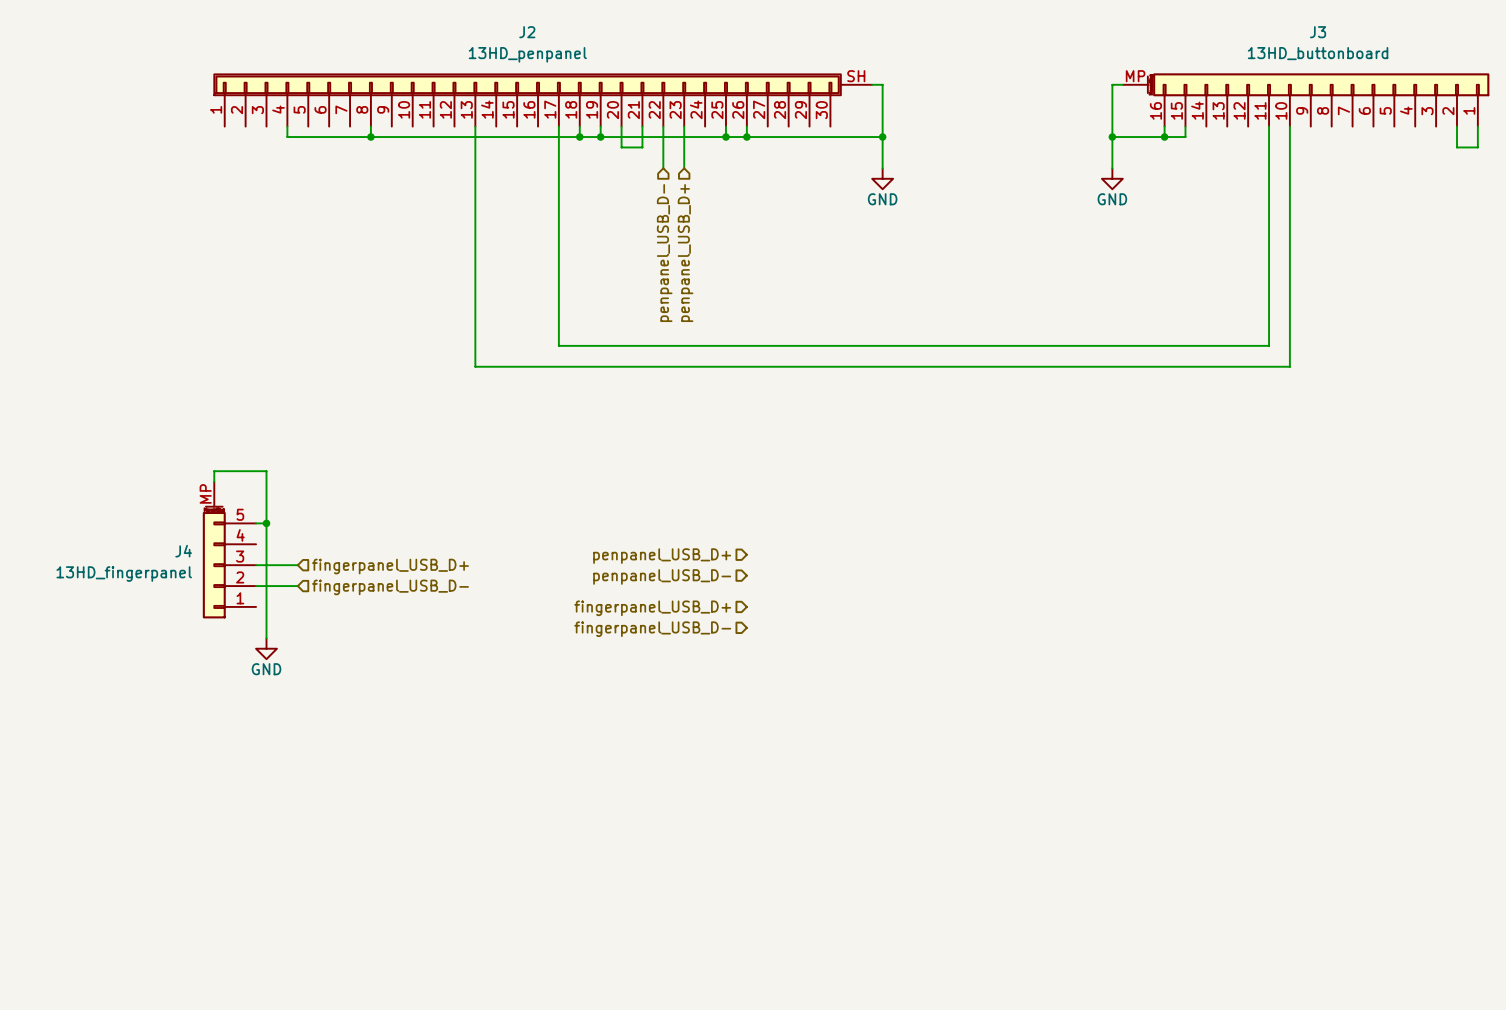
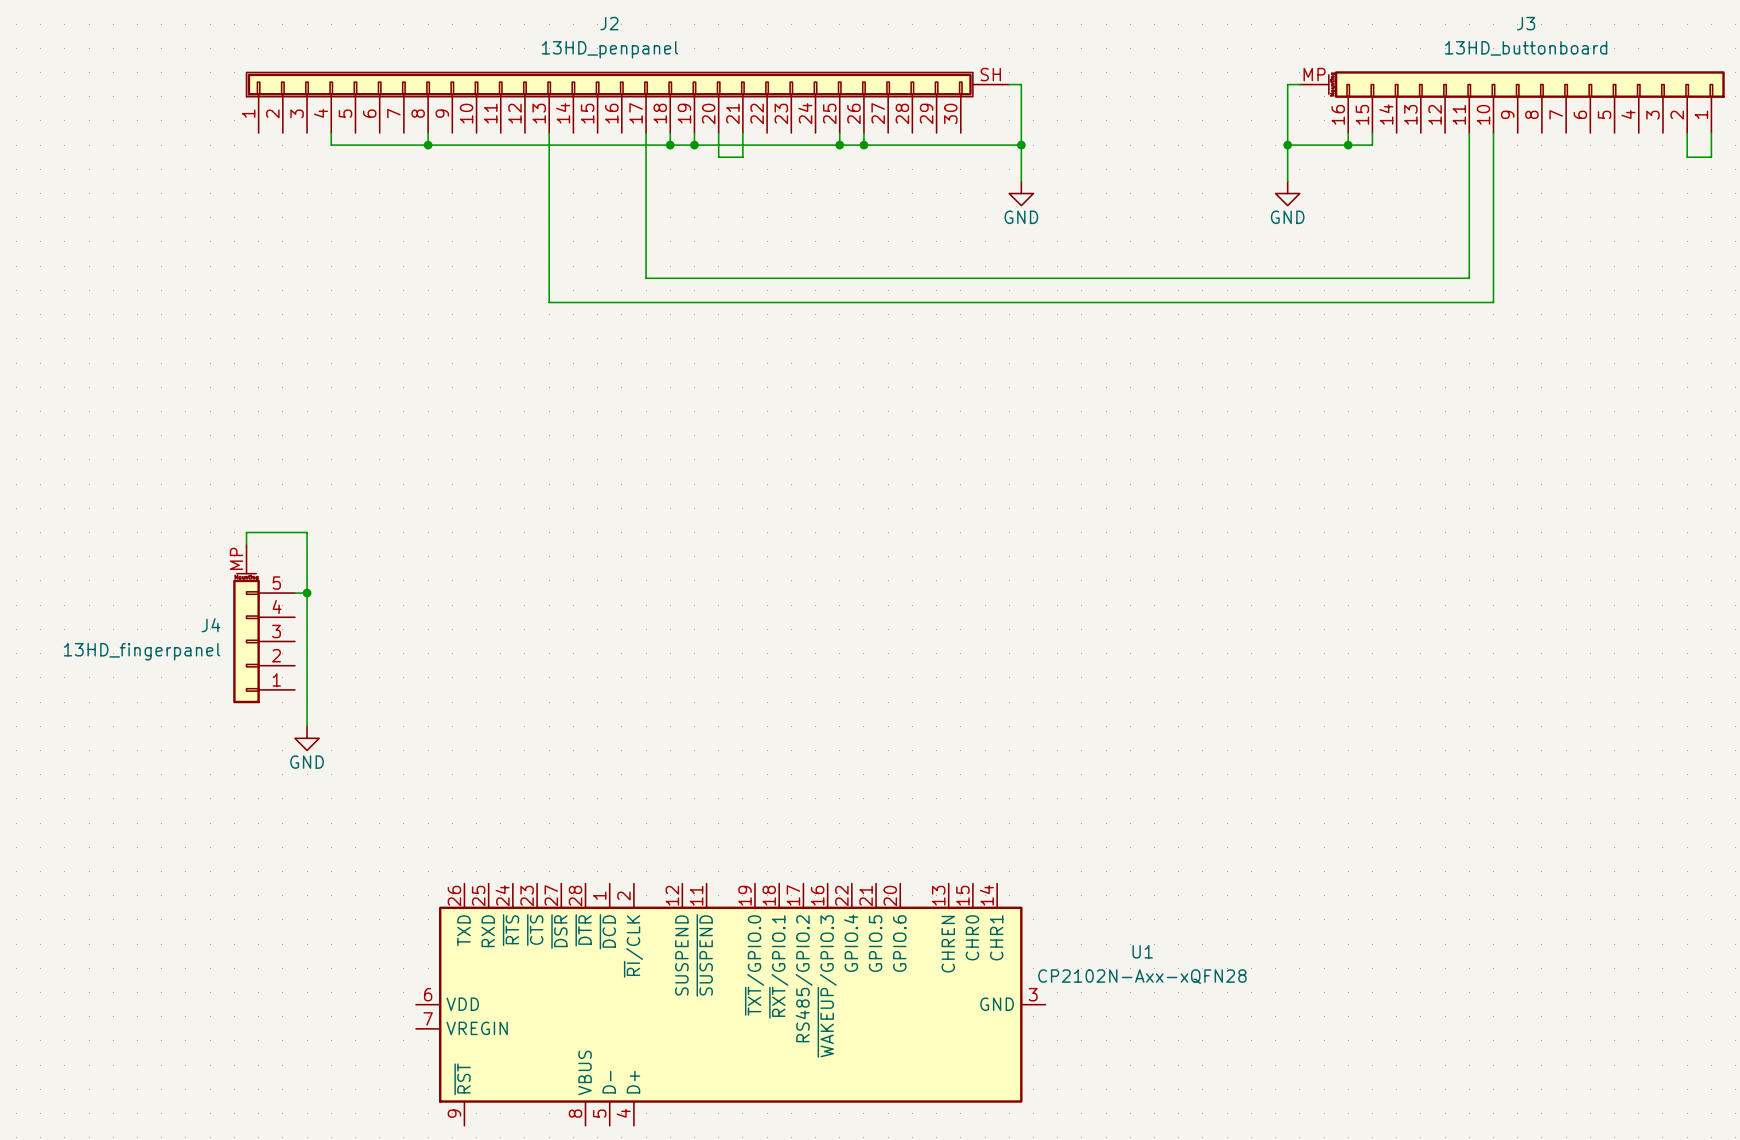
wire: (663, 126) (663, 168) -> none
wire: (684, 126) (684, 168) -> none
wire: (558, 251) (558, 345) (1269, 345) (1269, 251) -> (646, 278) (1469, 278)
hierarchical label: penpanel_USB_D- (664, 253) -> none
hierarchical label: penpanel_USB_D+ (685, 253) -> none
wire: (475, 272) (475, 366) (1289, 366) (1289, 272) -> (549, 302) (1493, 302)
hierarchical label: penpanel_USB_D+ (662, 556) -> none
wire: (256, 565) (297, 565) -> none
hierarchical label: fingerpanel_USB_D+ (390, 566) -> none
hierarchical label: penpanel_USB_D- (662, 576) -> none
wire: (256, 586) (297, 586) -> none
hierarchical label: fingerpanel_USB_D- (390, 587) -> none
hierarchical label: fingerpanel_USB_D+ (652, 608) -> none
hierarchical label: fingerpanel_USB_D- (652, 629) -> none
U1: none -> CP2102N-Axx-xQFN28 (730, 1004)

